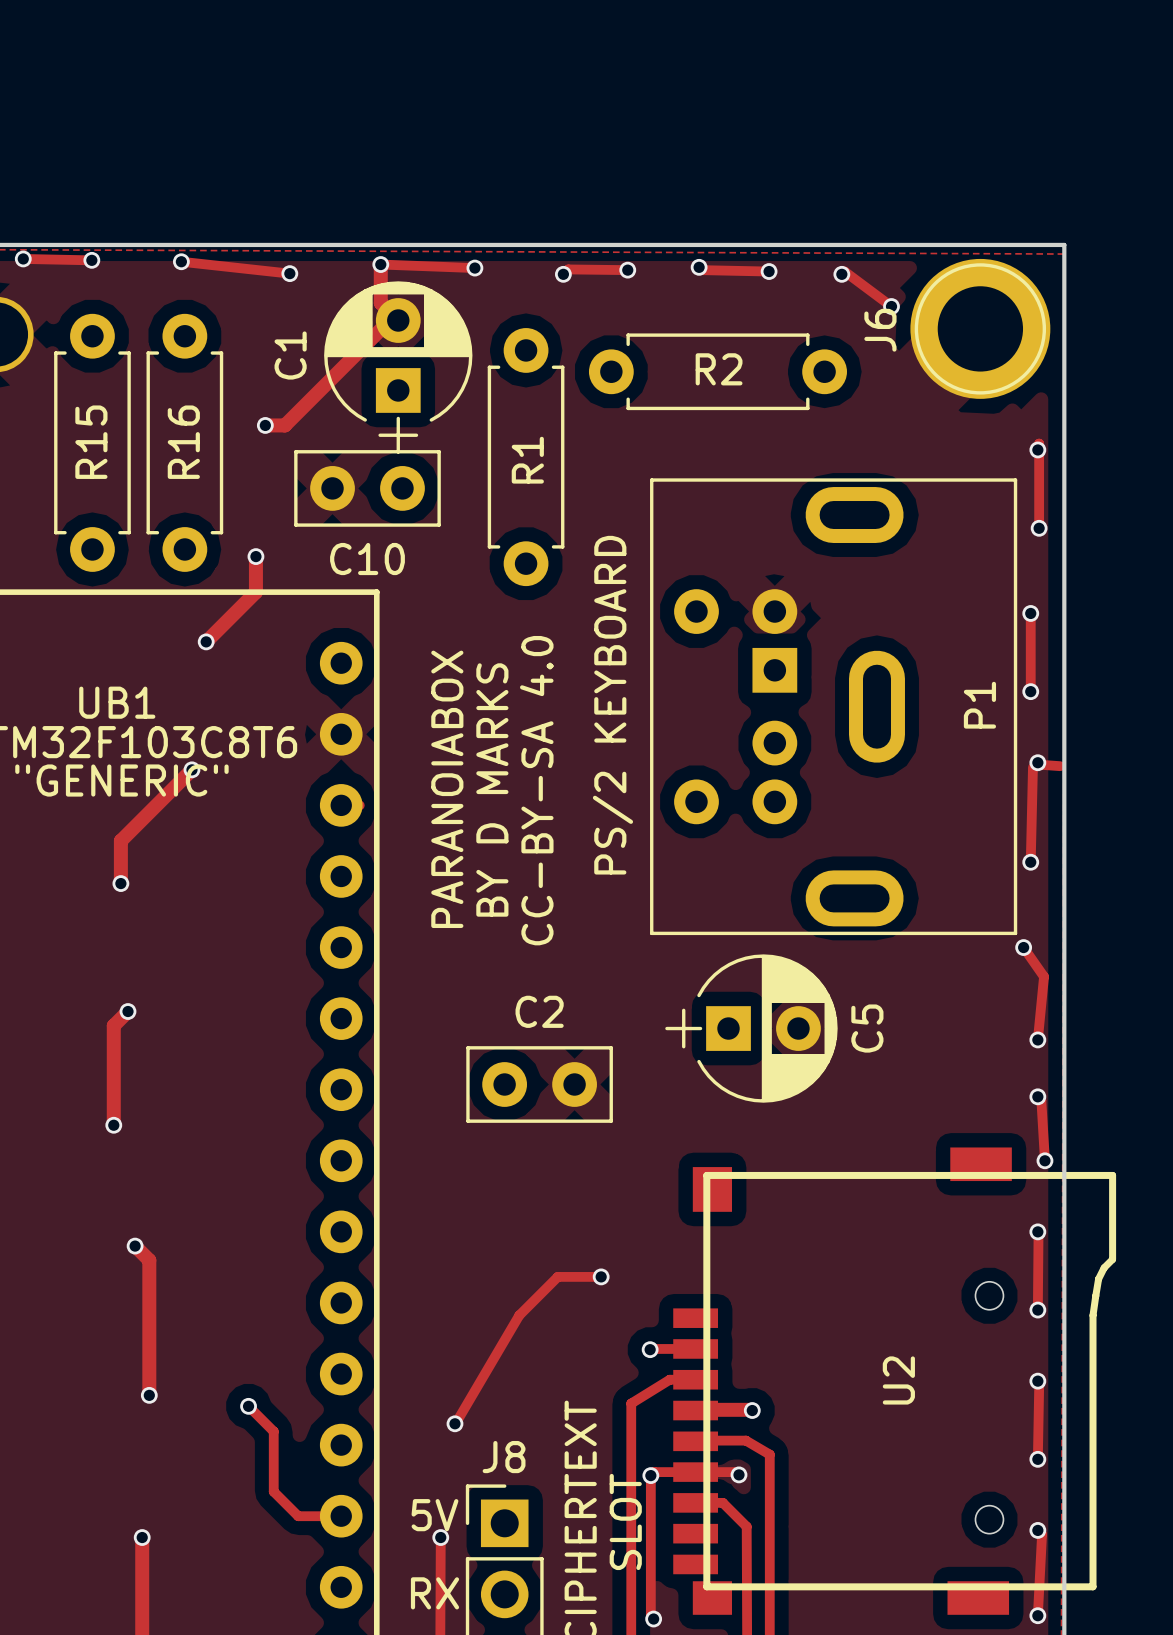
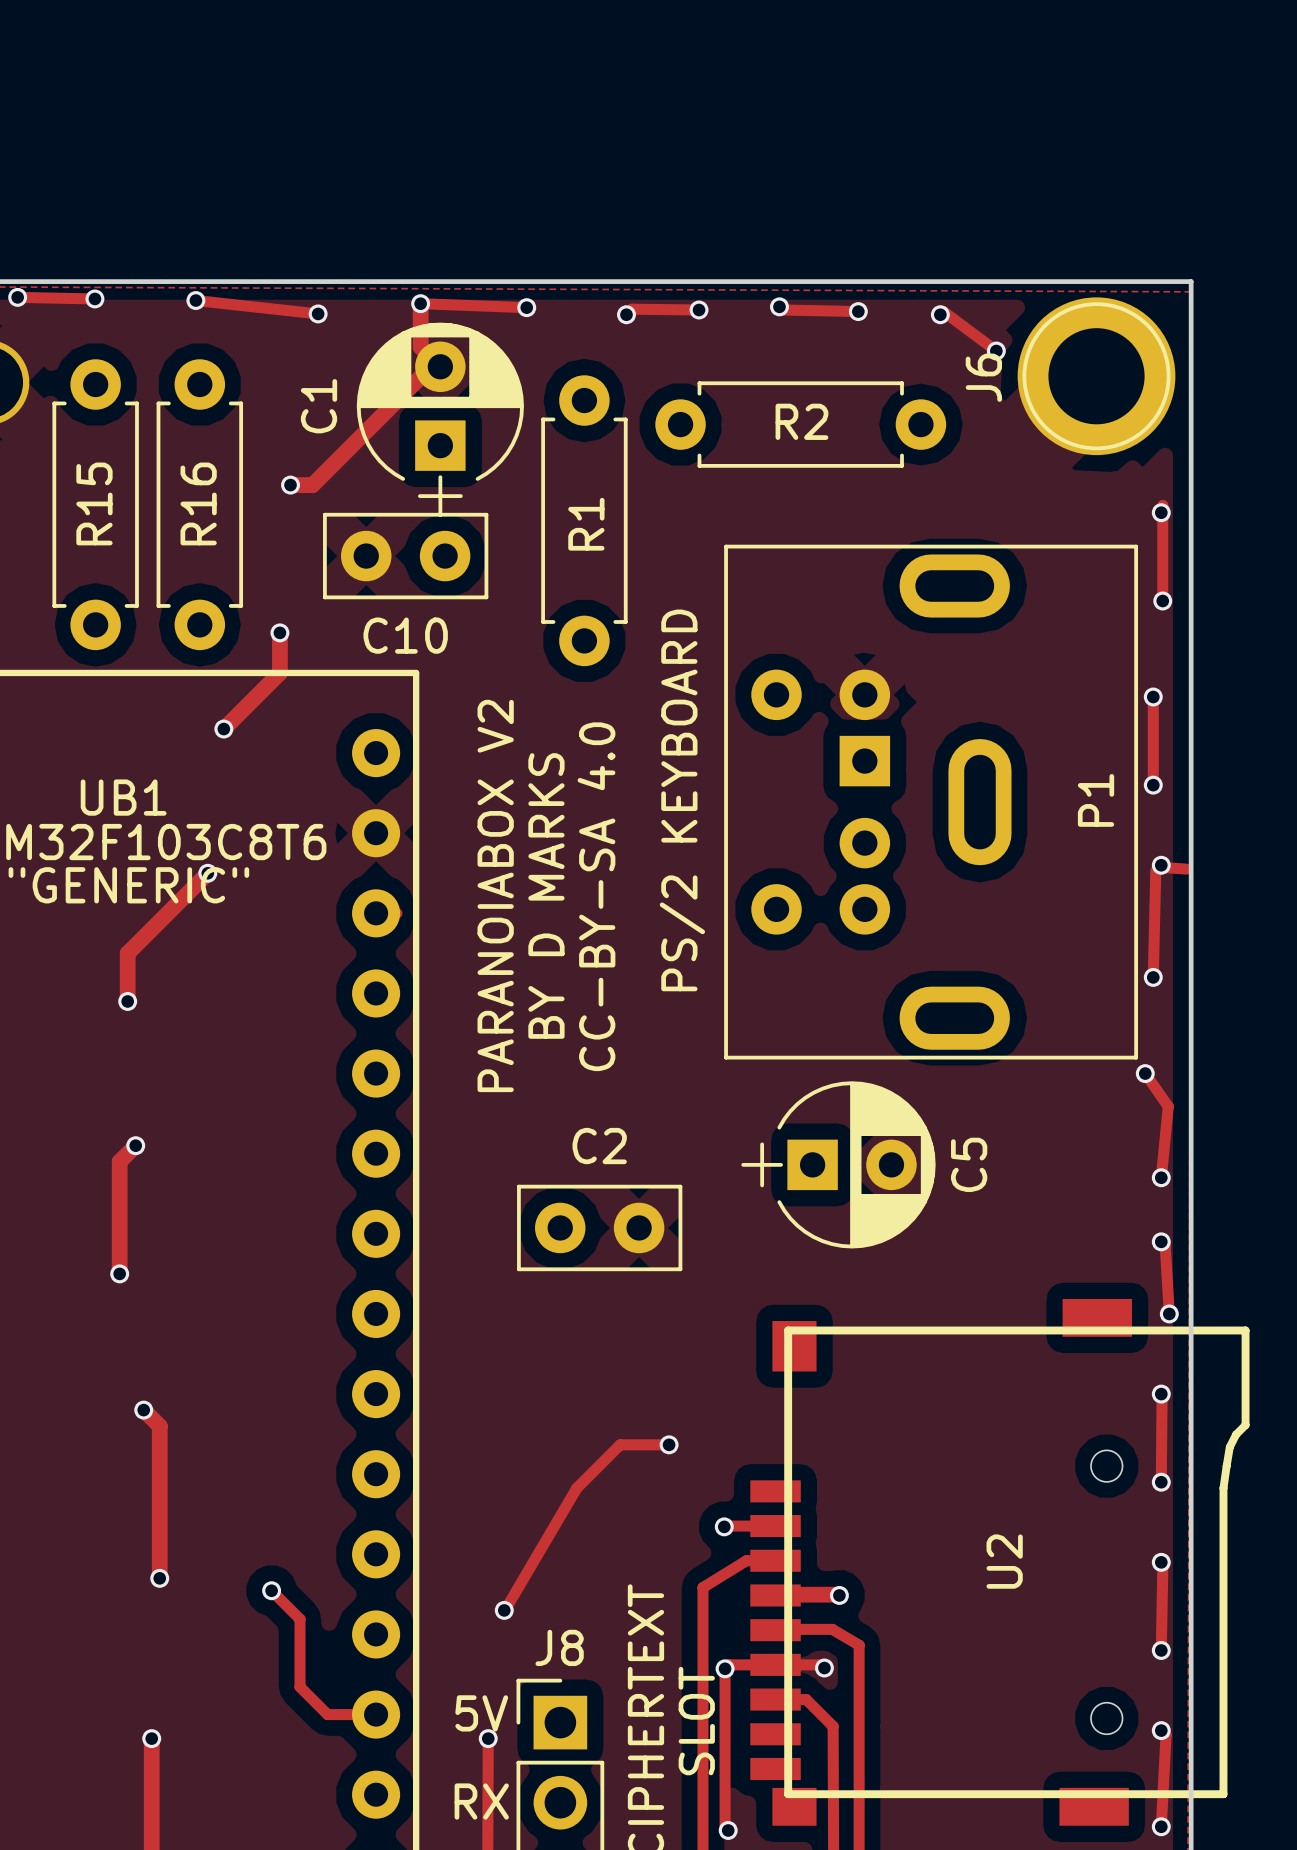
text: PARANOIABOX (447, 789) -> PARANOIABOX V2 (495, 895)

